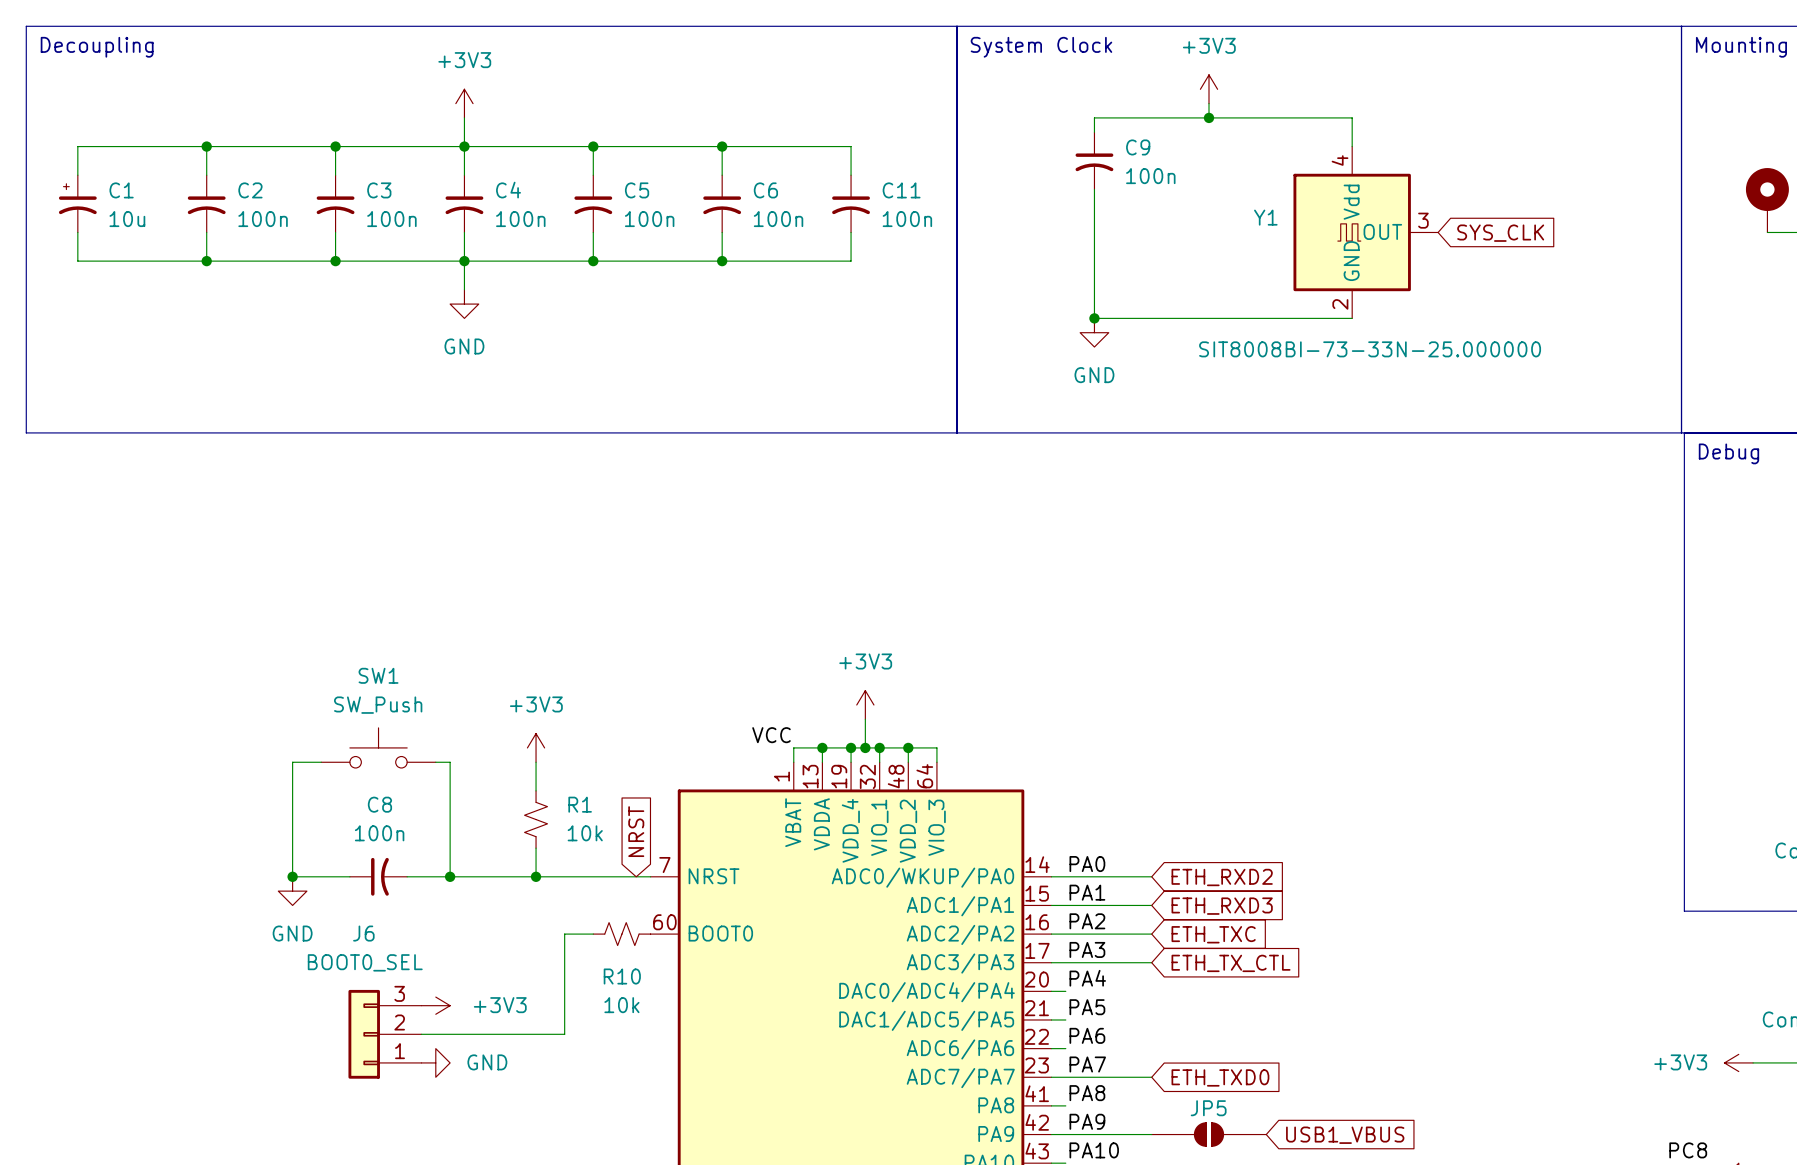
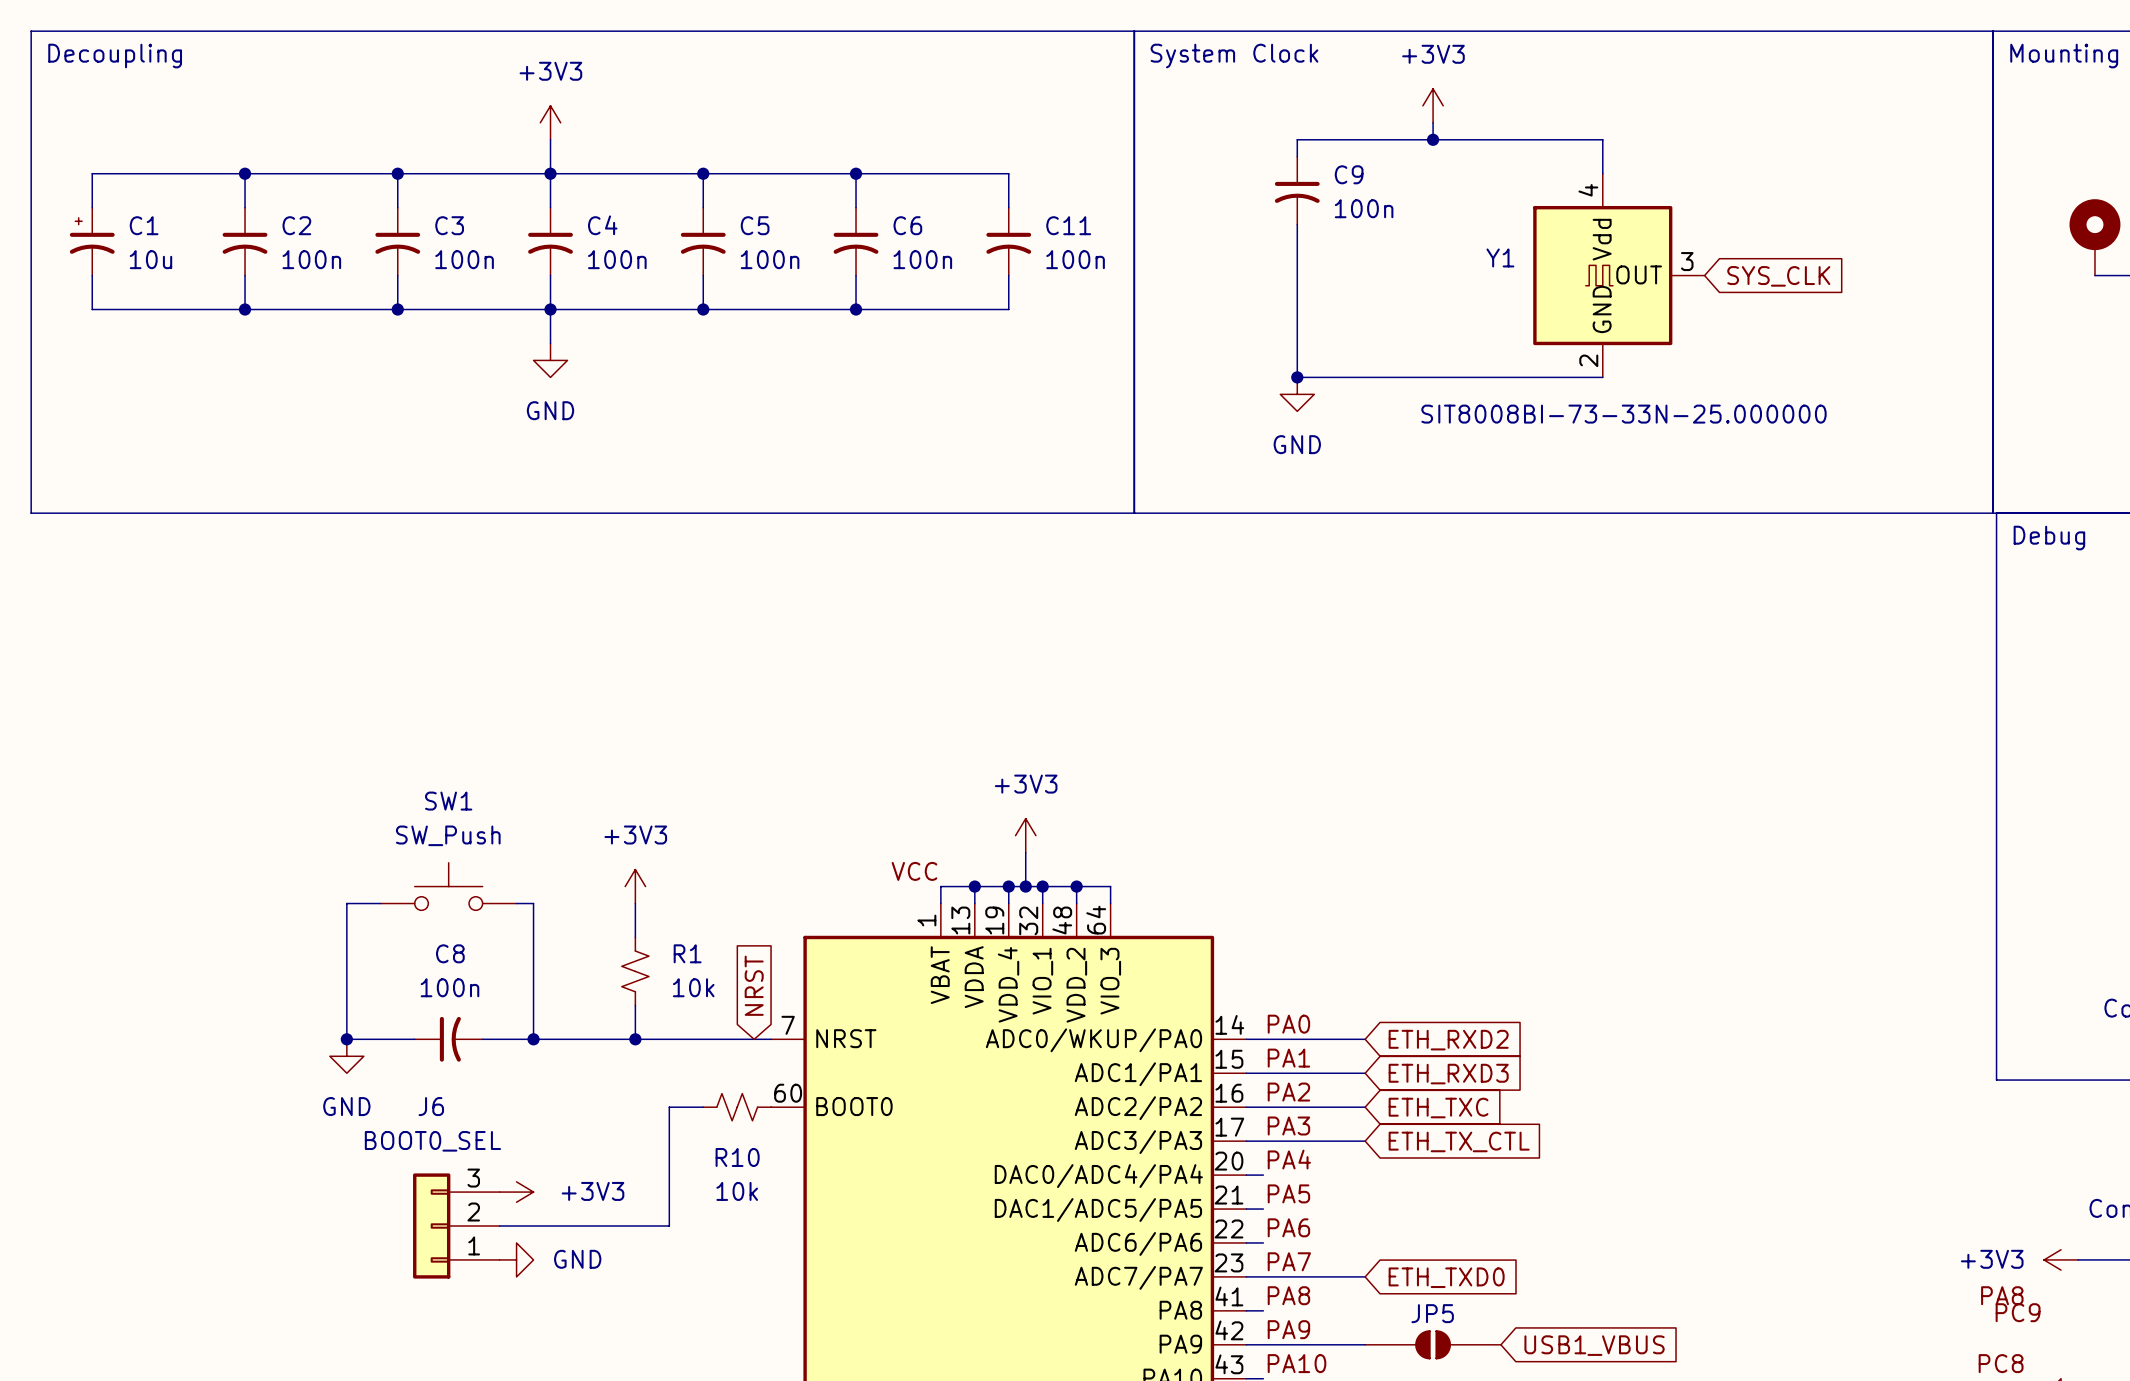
label: none -> PA8 (2002, 1295)
label: none -> PC9 (2018, 1312)

